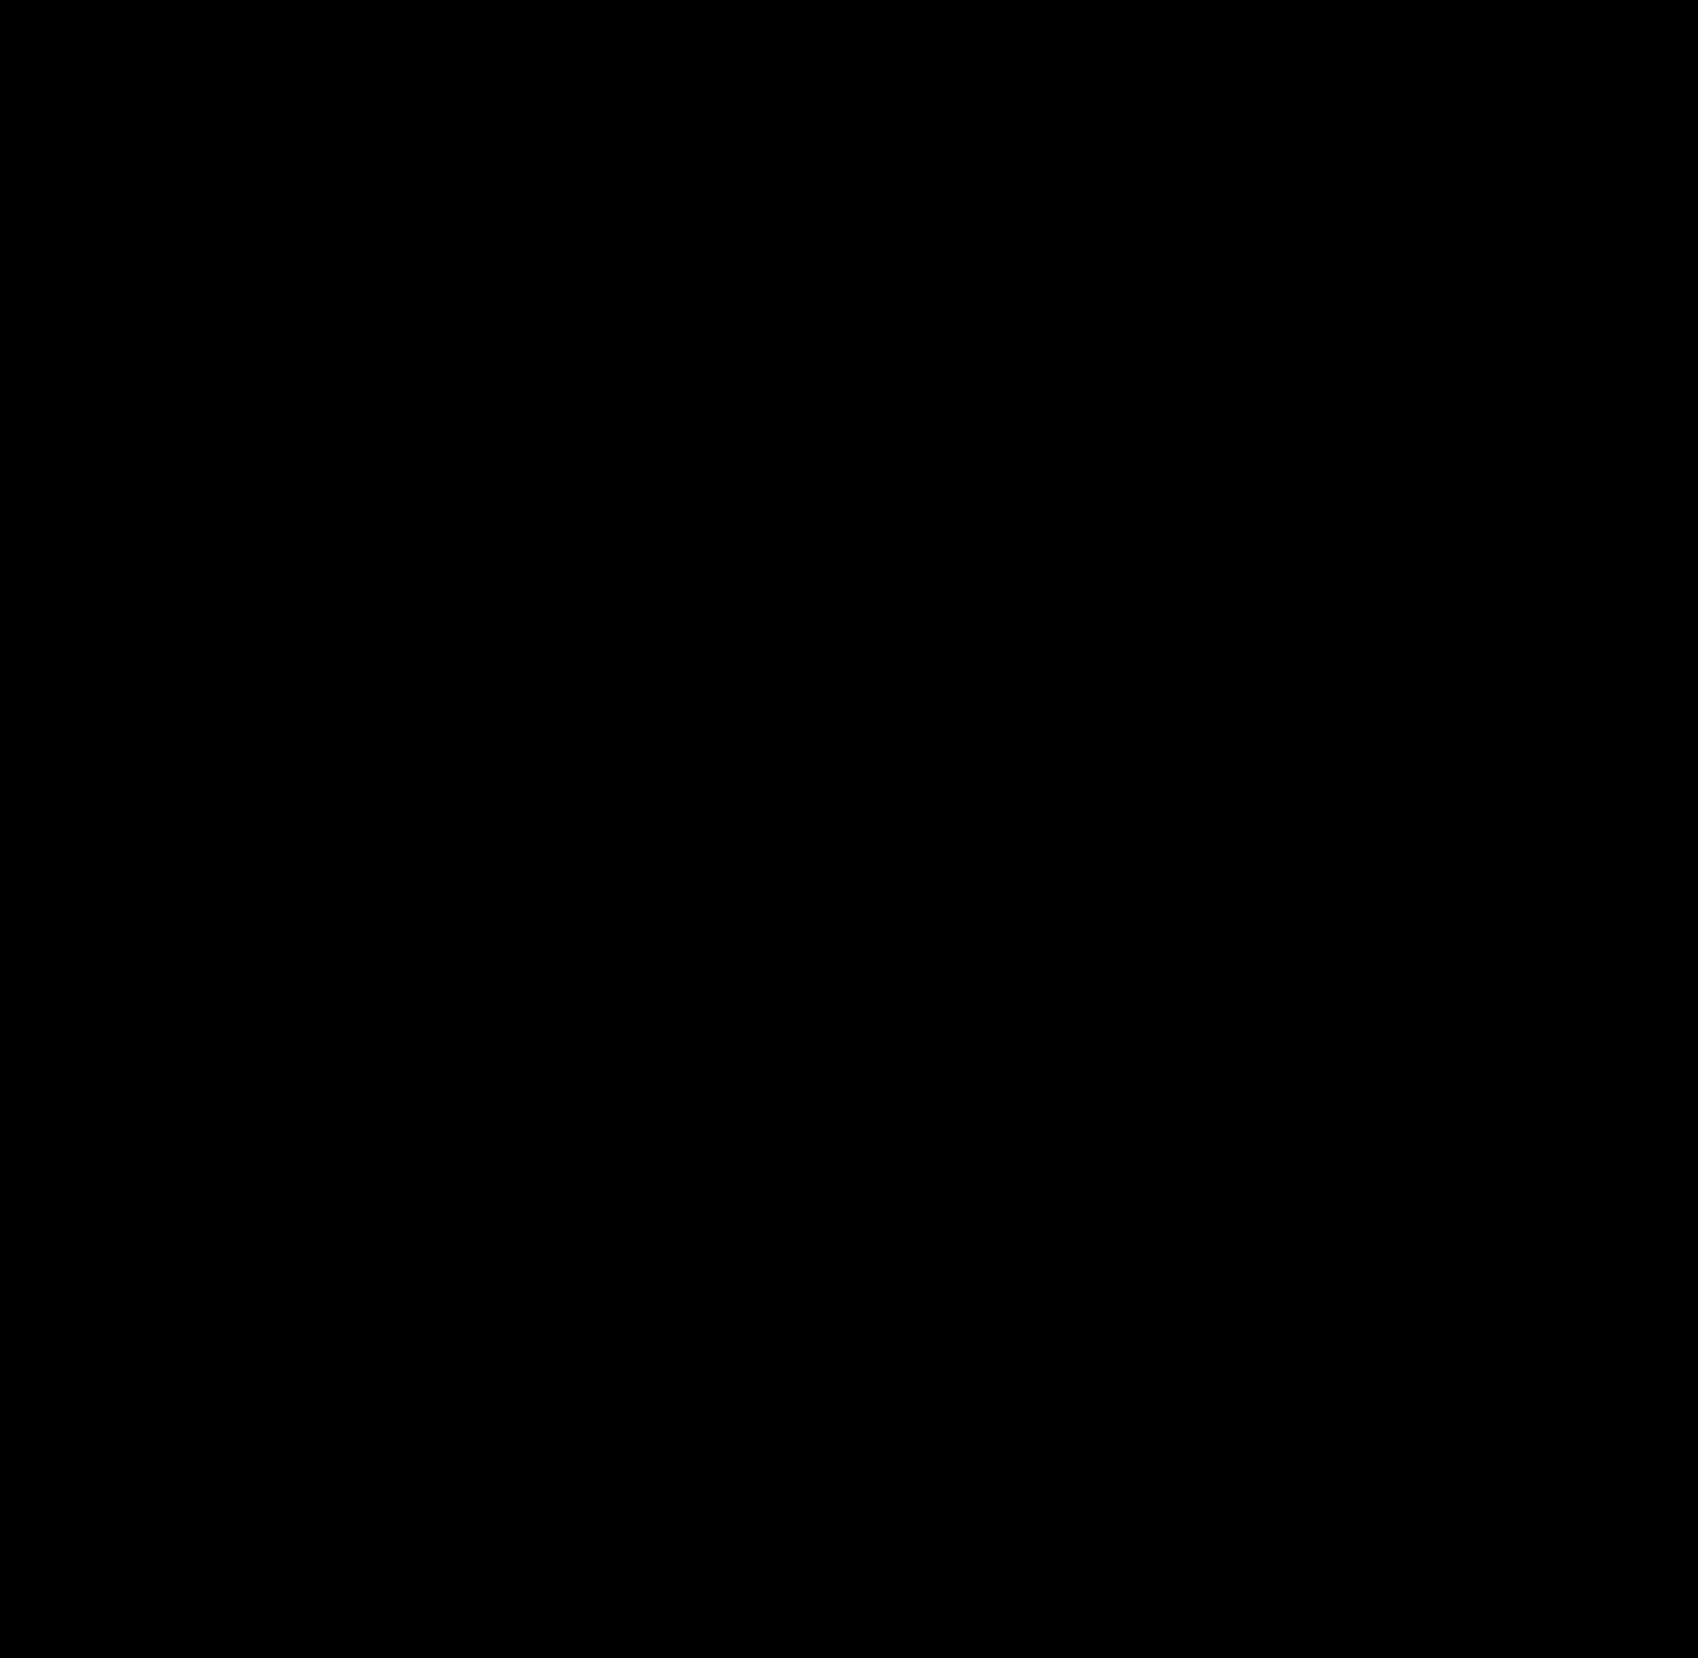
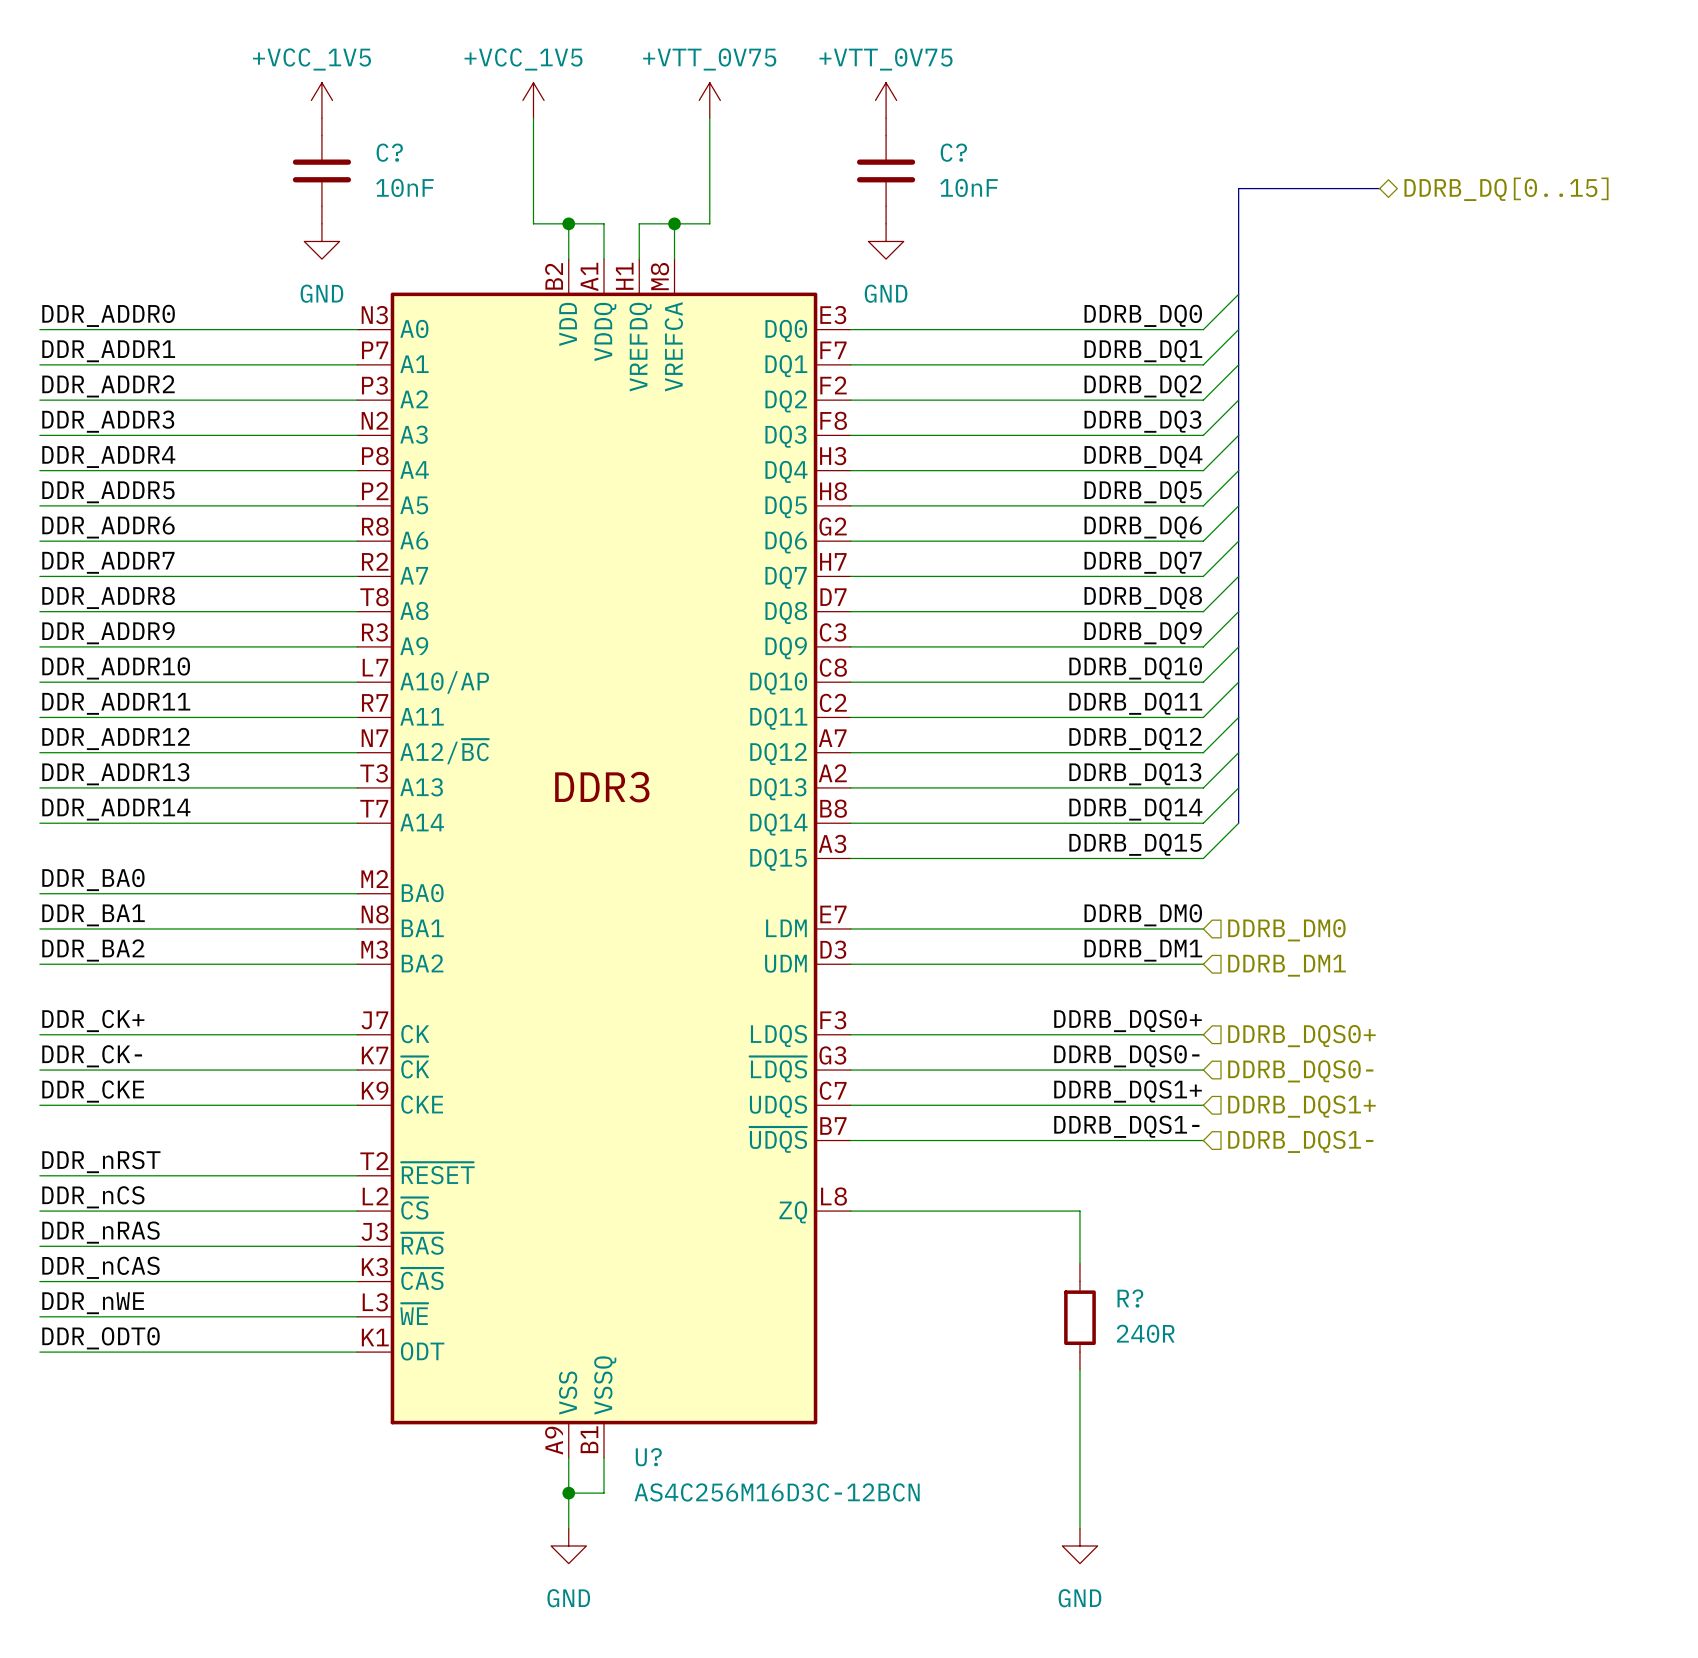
power symbol: none -> +VCC_1V5 (321, 100)
power symbol: none -> +VCC_1V5 (533, 100)
power symbol: none -> +VTT_0V75 (709, 100)
power symbol: none -> +VTT_0V75 (886, 100)
wire: none -> (533, 118) (533, 223) (604, 223) (604, 259)
wire: none -> (709, 118) (709, 223) (639, 223) (639, 259)
C?: none -> (321, 170)
C?: none -> (886, 170)
bus: none -> (1379, 188) (1238, 188) (1238, 823)
hierarchical label: none -> DDRB_DQ[0..15] (1506, 189)
wire: none -> (568, 223) (568, 259)
junction: none -> (568, 223)
wire: none -> (674, 223) (674, 259)
junction: none -> (674, 223)
power symbol: none -> GND (321, 241)
power symbol: none -> GND (886, 241)
wire: none -> (1238, 294) (1203, 329) (850, 329)
label: none -> DDR_ADDR0 (108, 315)
label: none -> DDRB_DQ0 (1143, 315)
wire: none -> (39, 329) (357, 329)
wire: none -> (1238, 329) (1203, 364) (850, 364)
label: none -> DDR_ADDR1 (108, 351)
label: none -> DDRB_DQ1 (1143, 351)
wire: none -> (39, 364) (357, 364)
wire: none -> (1238, 364) (1203, 400) (850, 400)
label: none -> DDR_ADDR2 (108, 386)
label: none -> DDRB_DQ2 (1143, 386)
wire: none -> (39, 400) (357, 400)
wire: none -> (1238, 400) (1203, 435) (850, 435)
label: none -> DDR_ADDR3 (108, 421)
label: none -> DDRB_DQ3 (1142, 421)
wire: none -> (39, 435) (357, 435)
wire: none -> (1238, 435) (1203, 470) (850, 470)
label: none -> DDR_ADDR4 (108, 457)
label: none -> DDRB_DQ4 (1143, 456)
wire: none -> (39, 470) (357, 470)
wire: none -> (1238, 470) (1203, 505) (850, 505)
label: none -> DDR_ADDR5 (108, 492)
label: none -> DDRB_DQ5 (1143, 492)
wire: none -> (39, 505) (357, 505)
wire: none -> (1238, 505) (1203, 541) (850, 541)
label: none -> DDR_ADDR6 (108, 527)
label: none -> DDRB_DQ6 (1143, 527)
wire: none -> (39, 541) (357, 541)
wire: none -> (1238, 541) (1203, 576) (850, 576)
label: none -> DDR_ADDR7 (108, 562)
label: none -> DDRB_DQ7 (1143, 562)
wire: none -> (39, 576) (357, 576)
wire: none -> (1238, 576) (1203, 611) (850, 611)
label: none -> DDR_ADDR8 (108, 597)
label: none -> DDRB_DQ8 (1143, 597)
wire: none -> (39, 611) (357, 611)
wire: none -> (1238, 611) (1203, 646) (850, 646)
label: none -> DDR_ADDR9 (108, 633)
label: none -> DDRB_DQ9 (1143, 633)
wire: none -> (39, 646) (357, 646)
wire: none -> (1238, 646) (1203, 682) (850, 682)
label: none -> DDR_ADDR10 (116, 668)
label: none -> DDRB_DQ10 (1135, 668)
wire: none -> (39, 682) (357, 682)
wire: none -> (1238, 682) (1203, 717) (850, 717)
label: none -> DDR_ADDR11 (116, 703)
label: none -> DDRB_DQ11 (1135, 703)
wire: none -> (39, 717) (357, 717)
wire: none -> (1238, 717) (1203, 752) (850, 752)
label: none -> DDR_ADDR12 (116, 738)
label: none -> DDRB_DQ12 (1135, 738)
wire: none -> (39, 752) (357, 752)
wire: none -> (1238, 752) (1203, 787) (850, 787)
label: none -> DDR_ADDR13 (115, 774)
label: none -> DDRB_DQ13 (1135, 774)
wire: none -> (39, 787) (357, 787)
wire: none -> (1238, 787) (1203, 823) (850, 823)
label: none -> DDR_ADDR14 (116, 809)
label: none -> DDRB_DQ14 (1135, 809)
wire: none -> (39, 823) (357, 823)
wire: none -> (1238, 823) (1203, 858) (850, 858)
label: none -> DDRB_DQ15 (1135, 844)
U?: none -> AS4C256M16D3C-12BCN (604, 858)
label: none -> DDR_BA0 (93, 879)
wire: none -> (39, 893) (357, 893)
label: none -> DDR_BA1 (93, 915)
label: none -> DDRB_DM0 (1143, 915)
wire: none -> (39, 928) (357, 928)
wire: none -> (850, 928) (1203, 928)
hierarchical label: none -> DDRB_DM0 (1286, 930)
label: none -> DDR_BA2 (93, 950)
label: none -> DDRB_DM1 (1143, 950)
wire: none -> (39, 964) (357, 964)
wire: none -> (850, 964) (1203, 964)
hierarchical label: none -> DDRB_DM1 (1286, 965)
label: none -> DDR_CK+ (93, 1021)
label: none -> DDRB_DQS0+ (1128, 1021)
wire: none -> (39, 1034) (357, 1034)
wire: none -> (850, 1034) (1203, 1034)
hierarchical label: none -> DDRB_DQS0+ (1301, 1036)
label: none -> DDR_CK- (92, 1056)
label: none -> DDRB_DQS0- (1126, 1056)
wire: none -> (39, 1070) (357, 1070)
wire: none -> (850, 1070) (1203, 1070)
hierarchical label: none -> DDRB_DQS0- (1300, 1071)
label: none -> DDR_CKE (93, 1091)
label: none -> DDRB_DQS1+ (1128, 1091)
wire: none -> (39, 1105) (357, 1105)
wire: none -> (850, 1105) (1203, 1105)
hierarchical label: none -> DDRB_DQS1+ (1301, 1106)
label: none -> DDRB_DQS1- (1126, 1126)
wire: none -> (850, 1140) (1203, 1140)
hierarchical label: none -> DDRB_DQS1- (1300, 1141)
label: none -> DDR_nRST (101, 1162)
wire: none -> (39, 1175) (357, 1175)
label: none -> DDR_nCS (93, 1197)
wire: none -> (39, 1211) (357, 1211)
wire: none -> (850, 1211) (1079, 1211) (1079, 1263)
label: none -> DDR_nRAS (100, 1232)
wire: none -> (39, 1246) (357, 1246)
label: none -> DDR_nCAS (100, 1267)
wire: none -> (39, 1281) (357, 1281)
label: none -> DDR_nWE (93, 1303)
wire: none -> (39, 1316) (357, 1316)
R?: none -> (1079, 1316)
label: none -> DDR_ODT0 (100, 1338)
wire: none -> (39, 1352) (357, 1352)
wire: none -> (1079, 1369) (1079, 1528)
wire: none -> (568, 1457) (568, 1528)
wire: none -> (604, 1457) (604, 1493) (568, 1493)
junction: none -> (568, 1493)
power symbol: none -> GND (568, 1545)
power symbol: none -> GND (1079, 1545)

